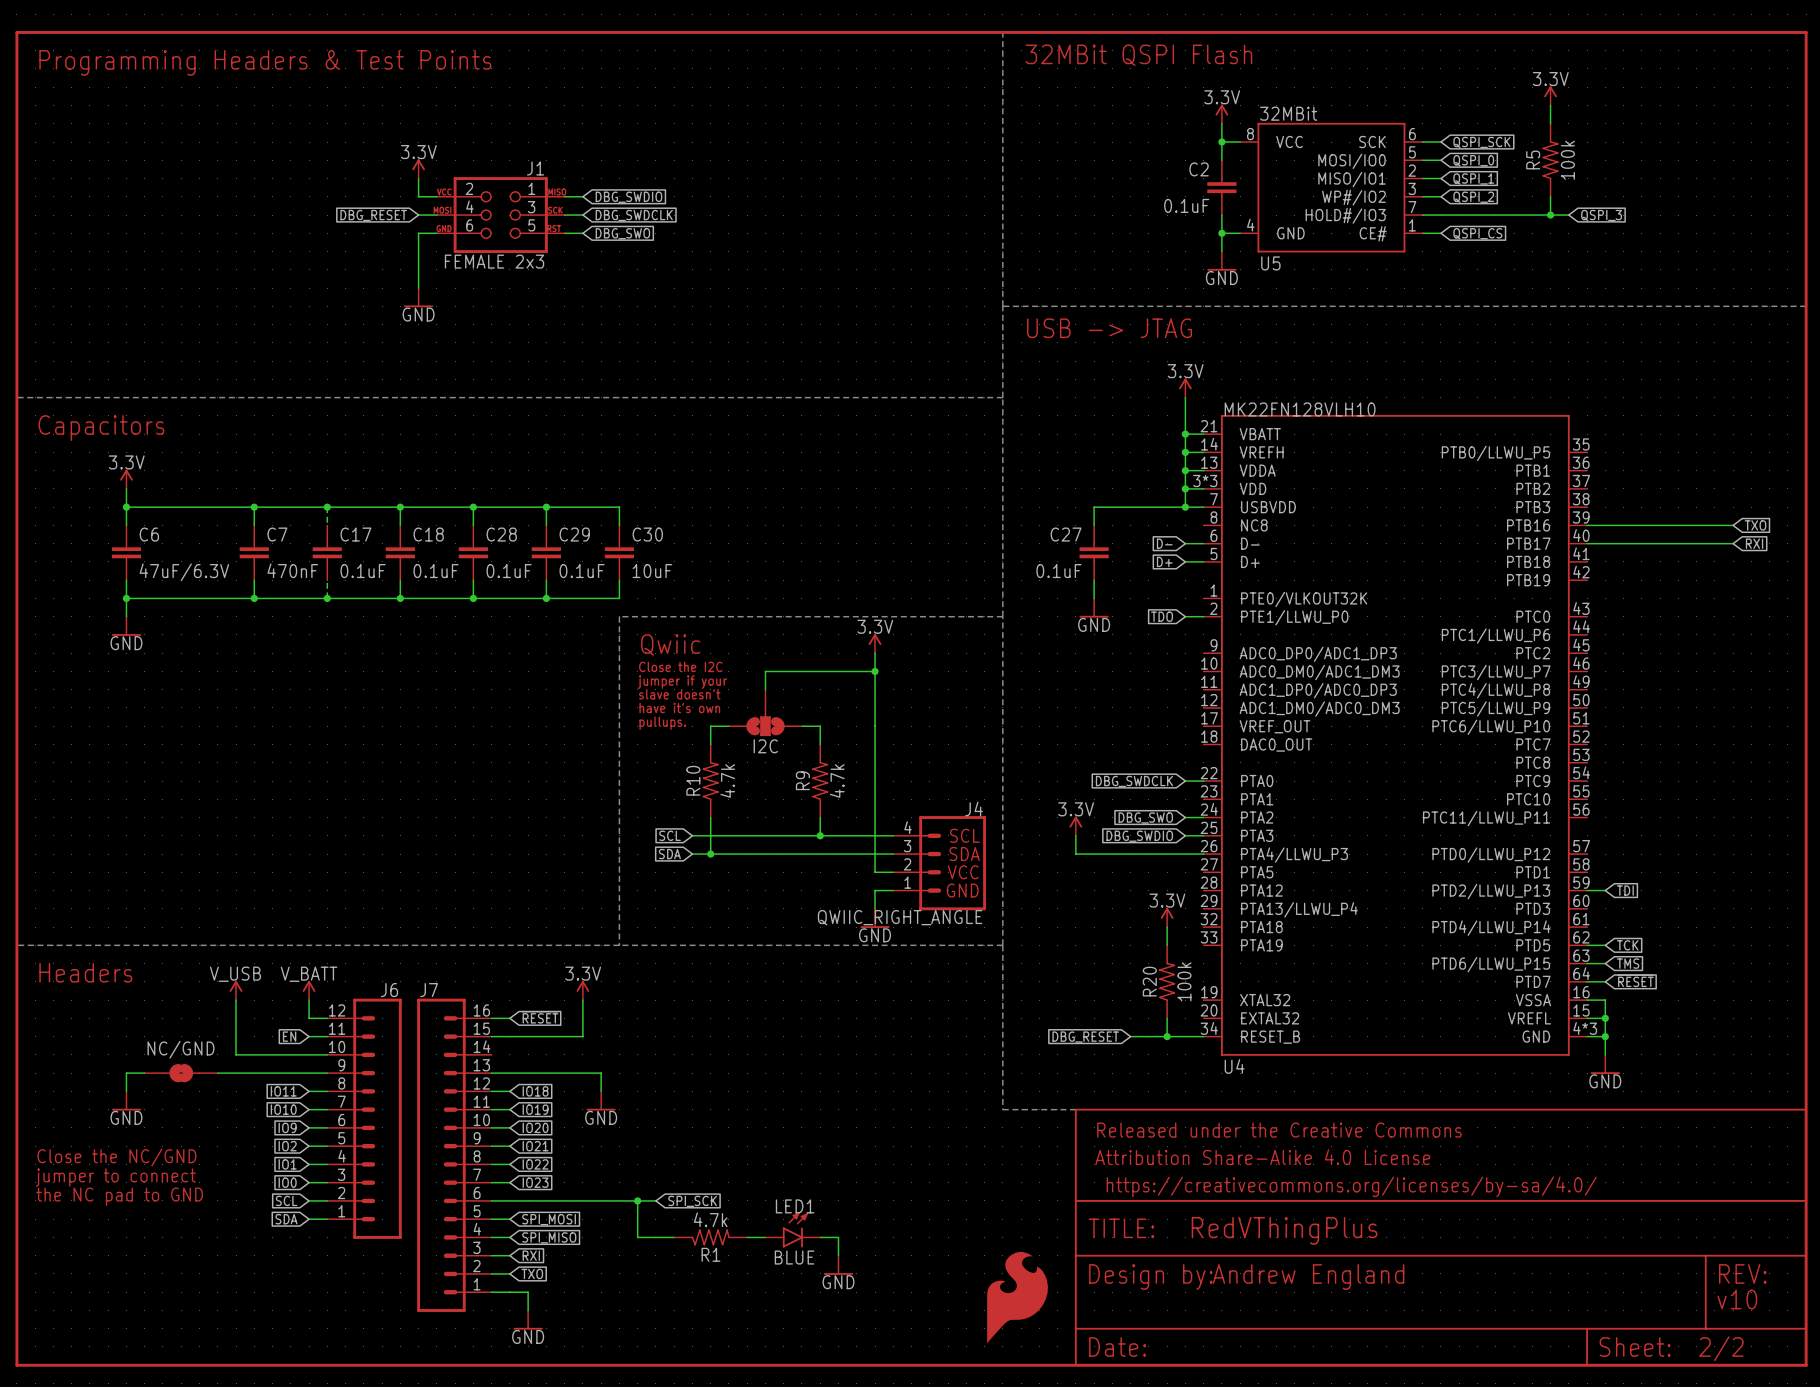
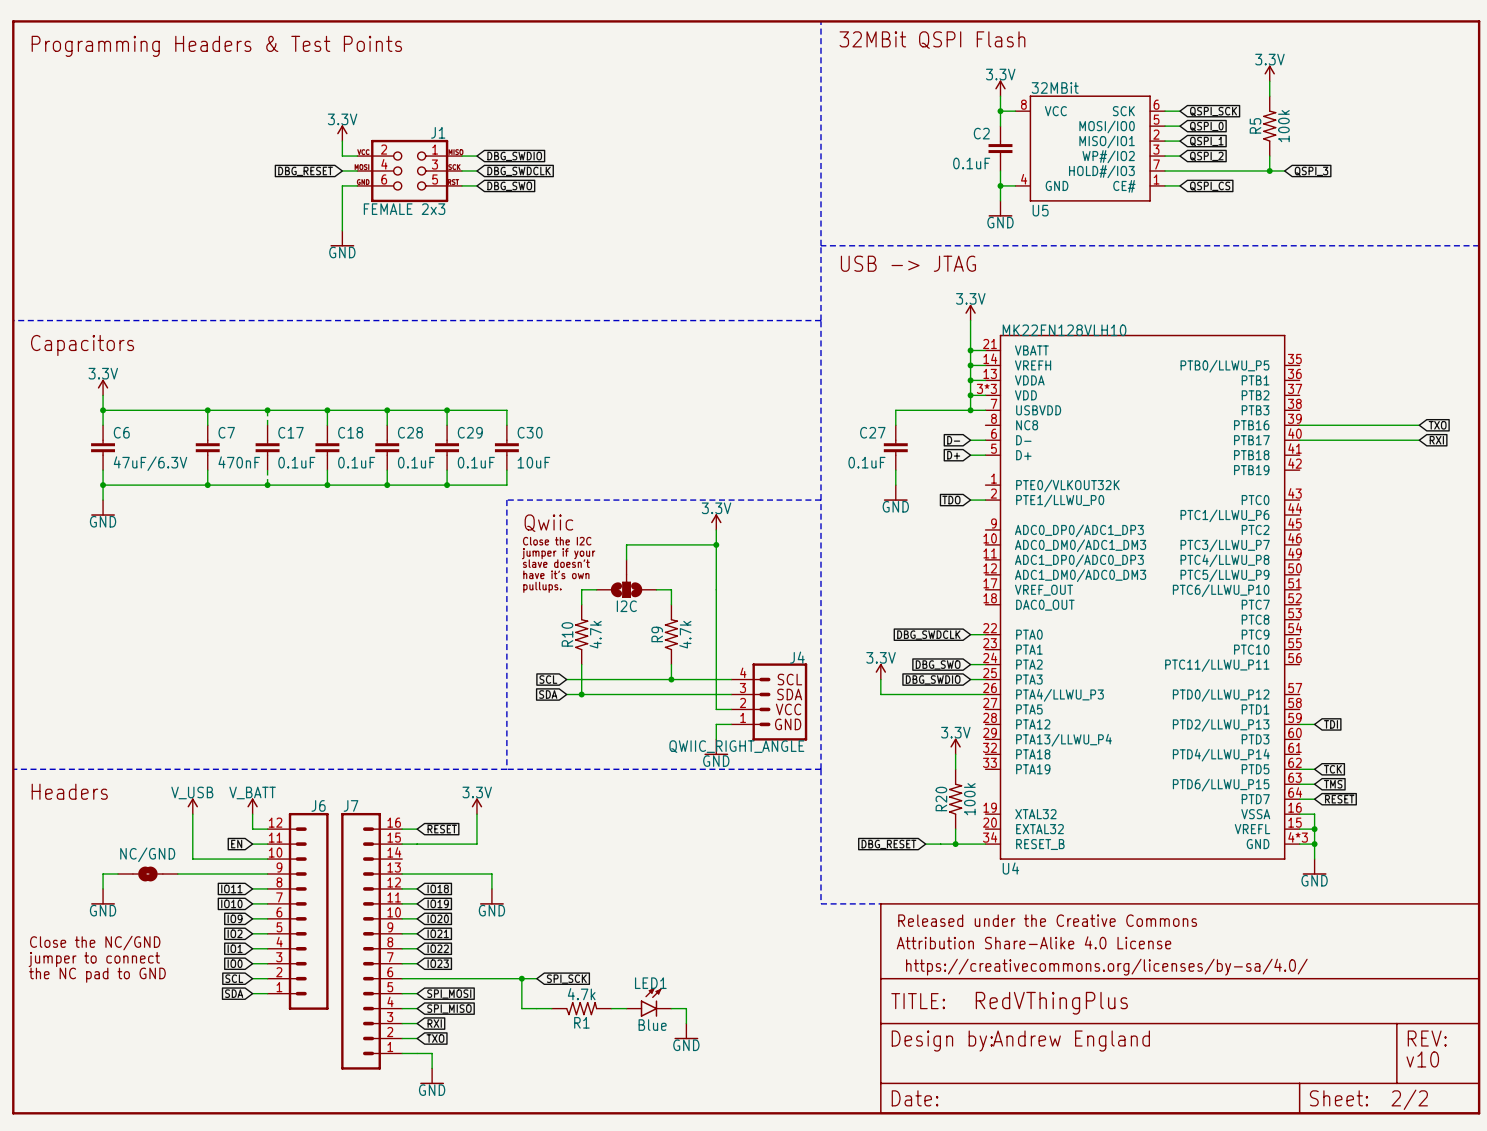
LED1 value: BLUE (794, 1257) -> Blue (652, 1025)
part: (1017, 1297) -> none

